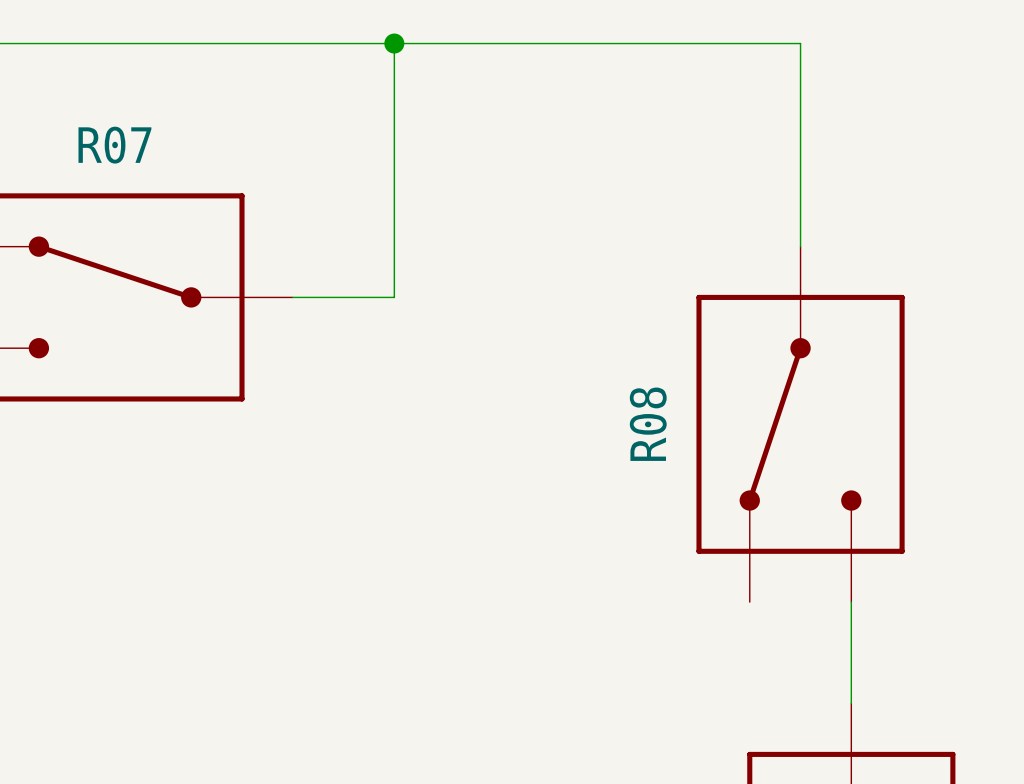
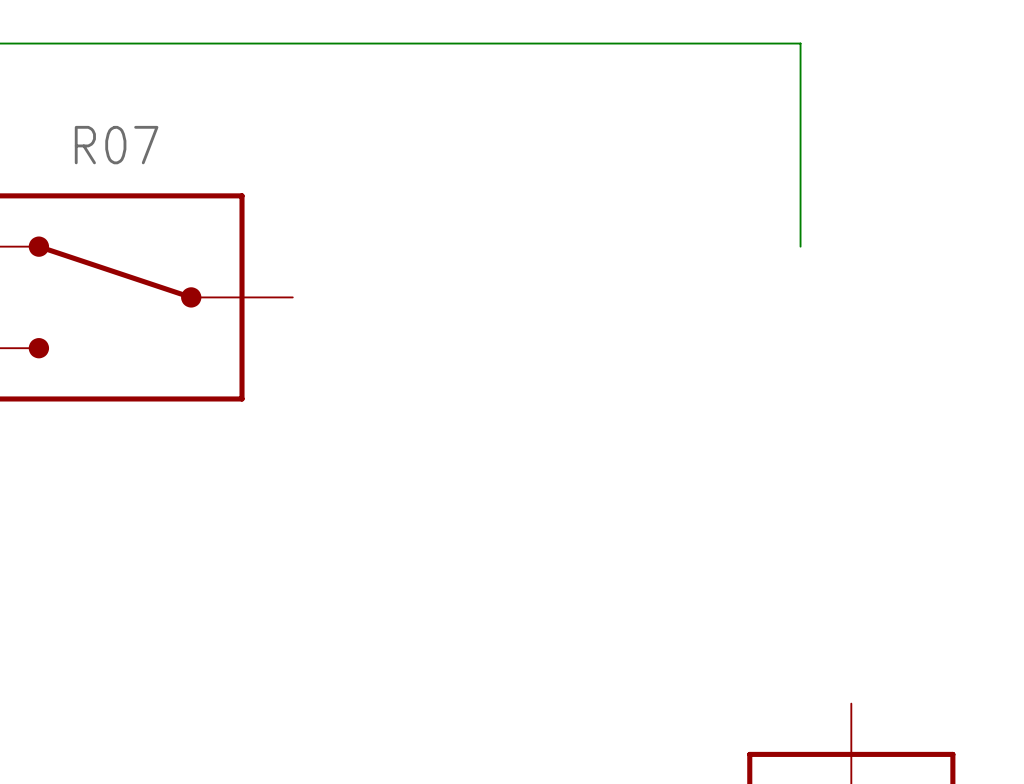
wire: (394, 43) (394, 297) (292, 297) -> none
junction: (394, 43) -> none
R08: (800, 424) -> none
wire: (851, 602) (851, 703) -> none

